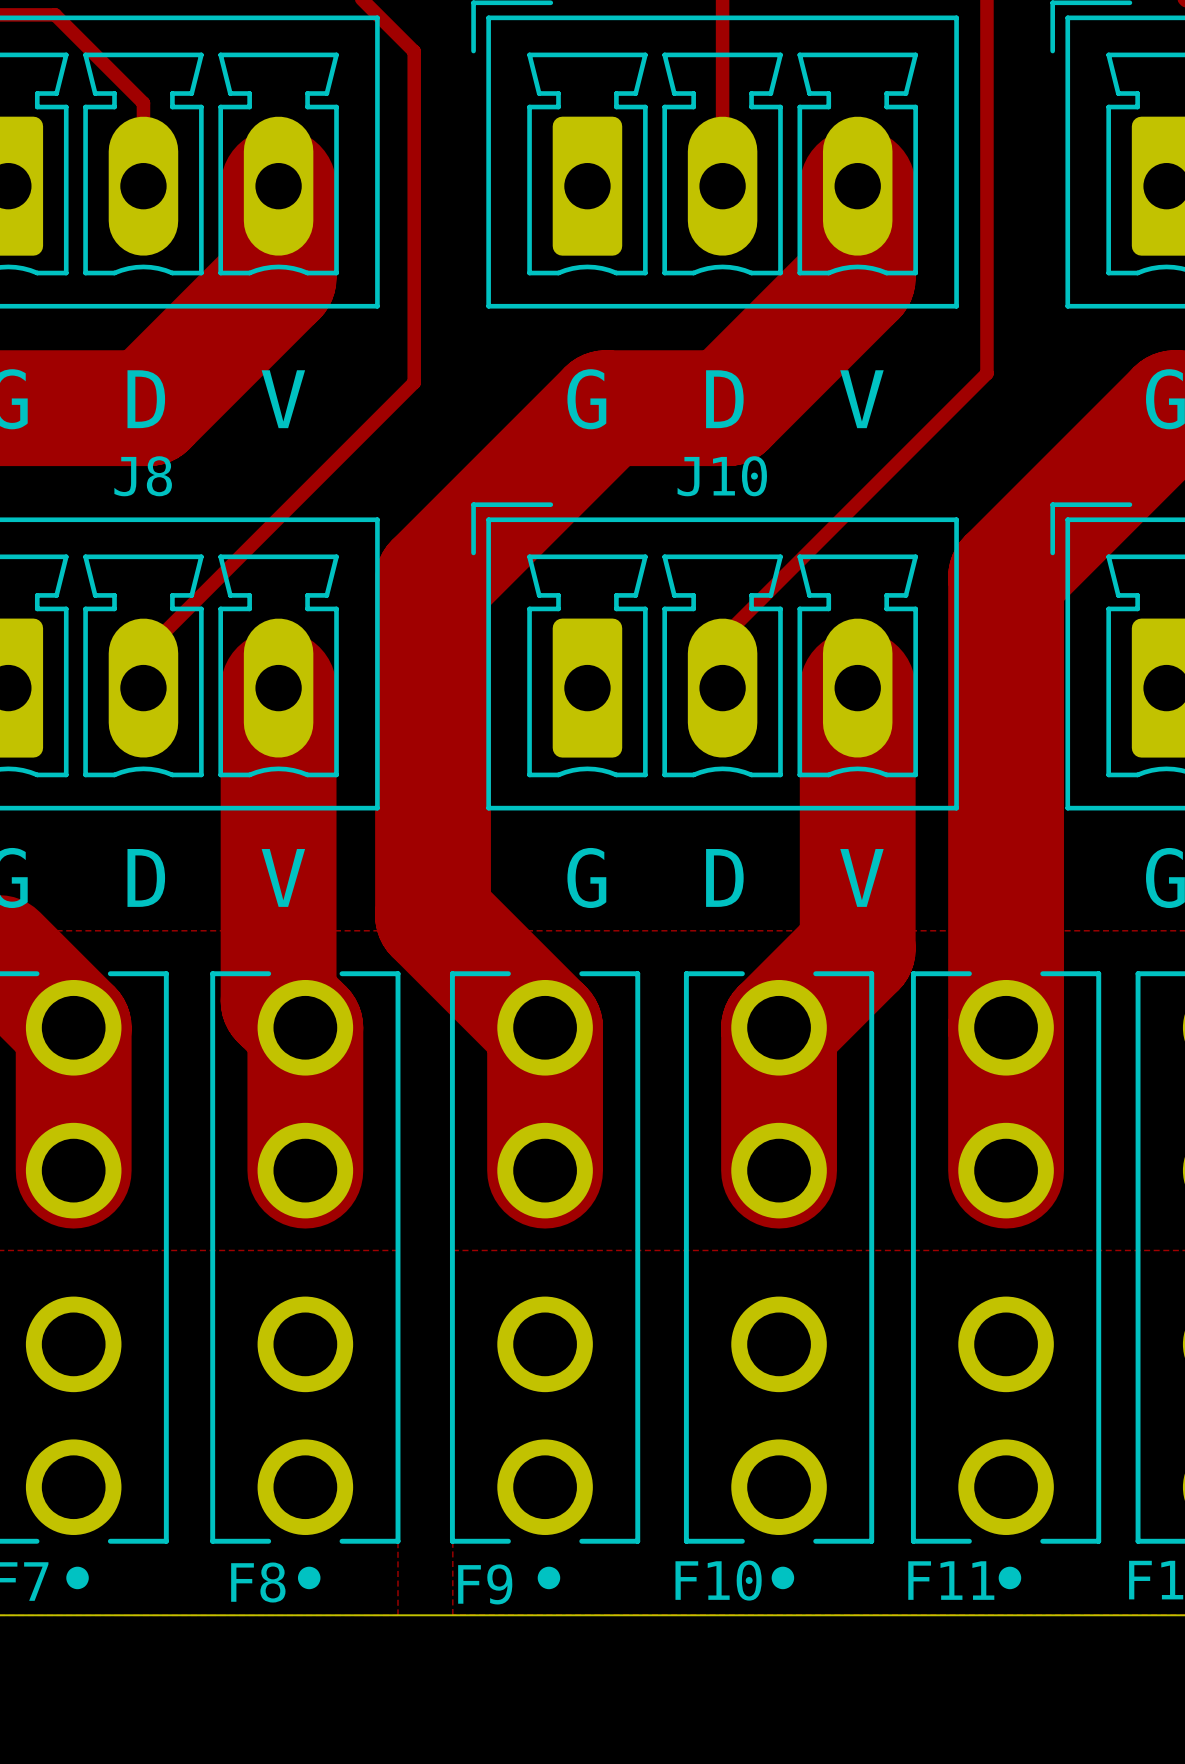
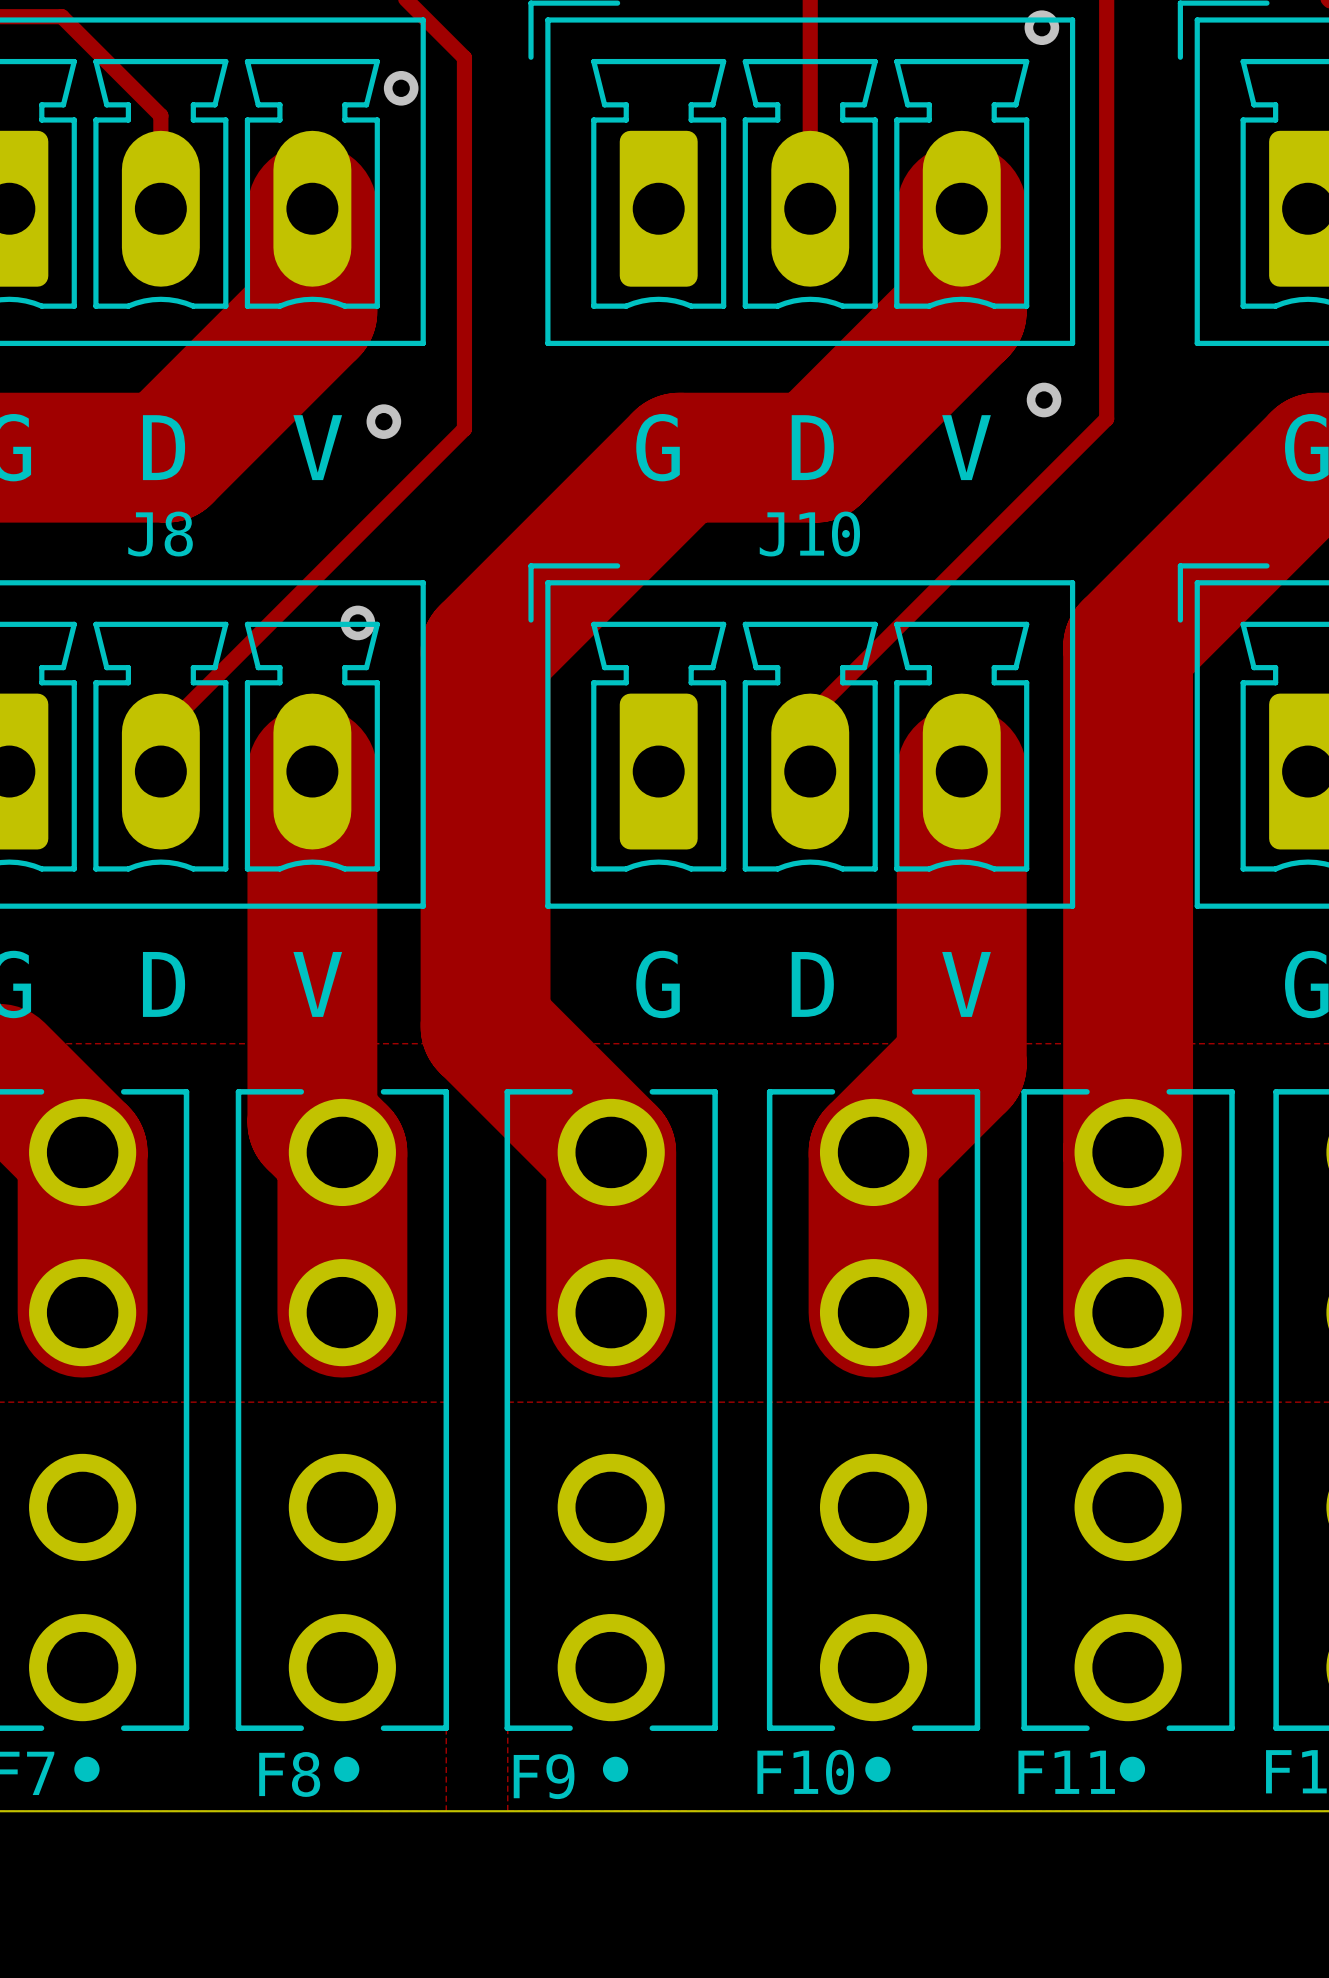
via: none -> (1041, 27)
via: none -> (401, 88)
via: none -> (1044, 400)
via: none -> (383, 421)
via: none -> (357, 622)

